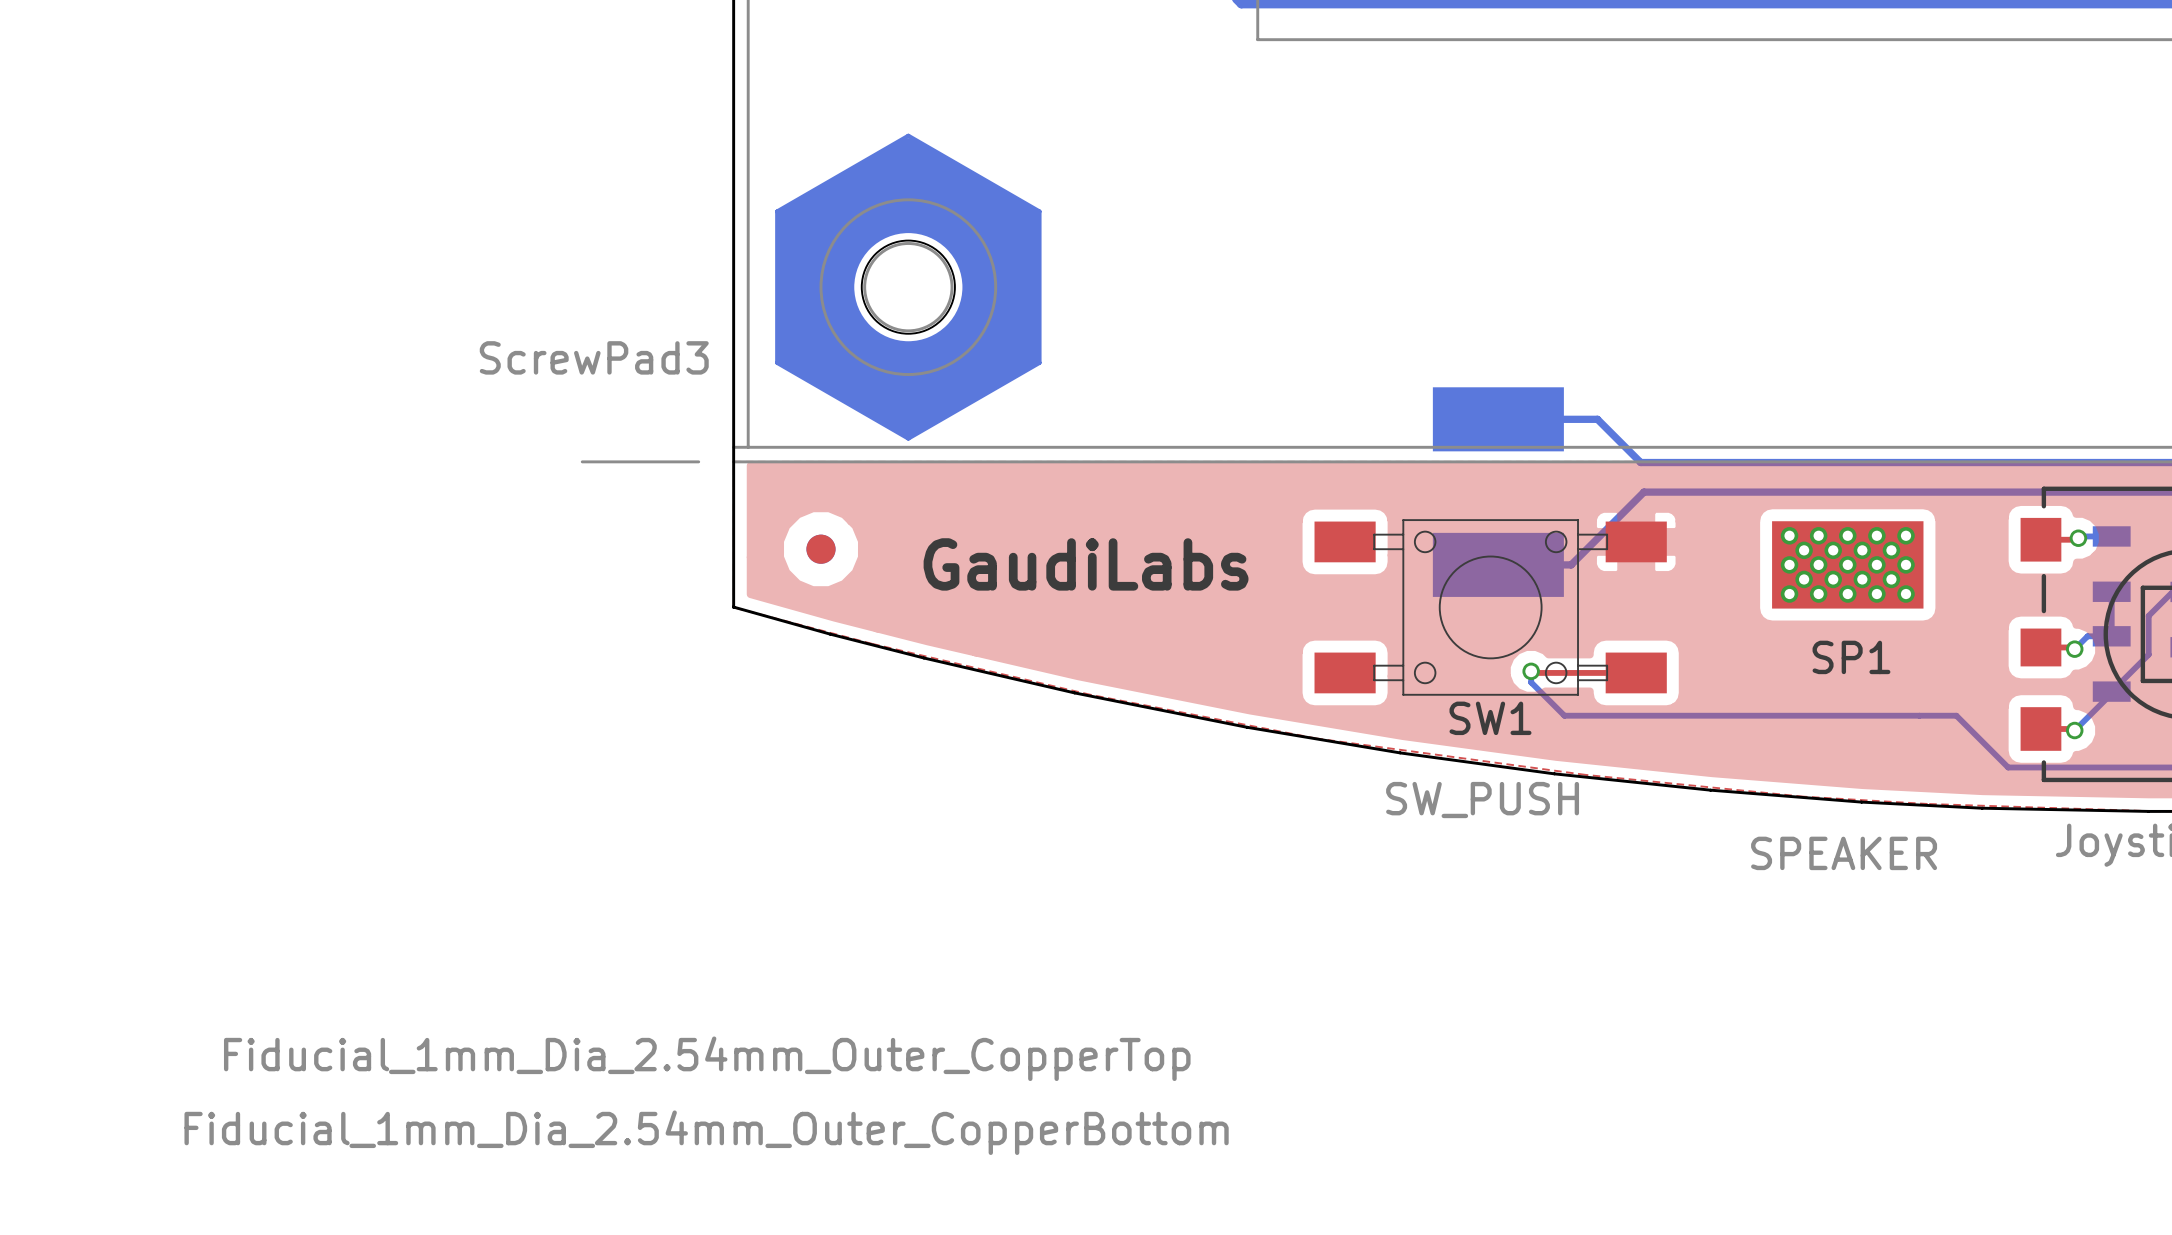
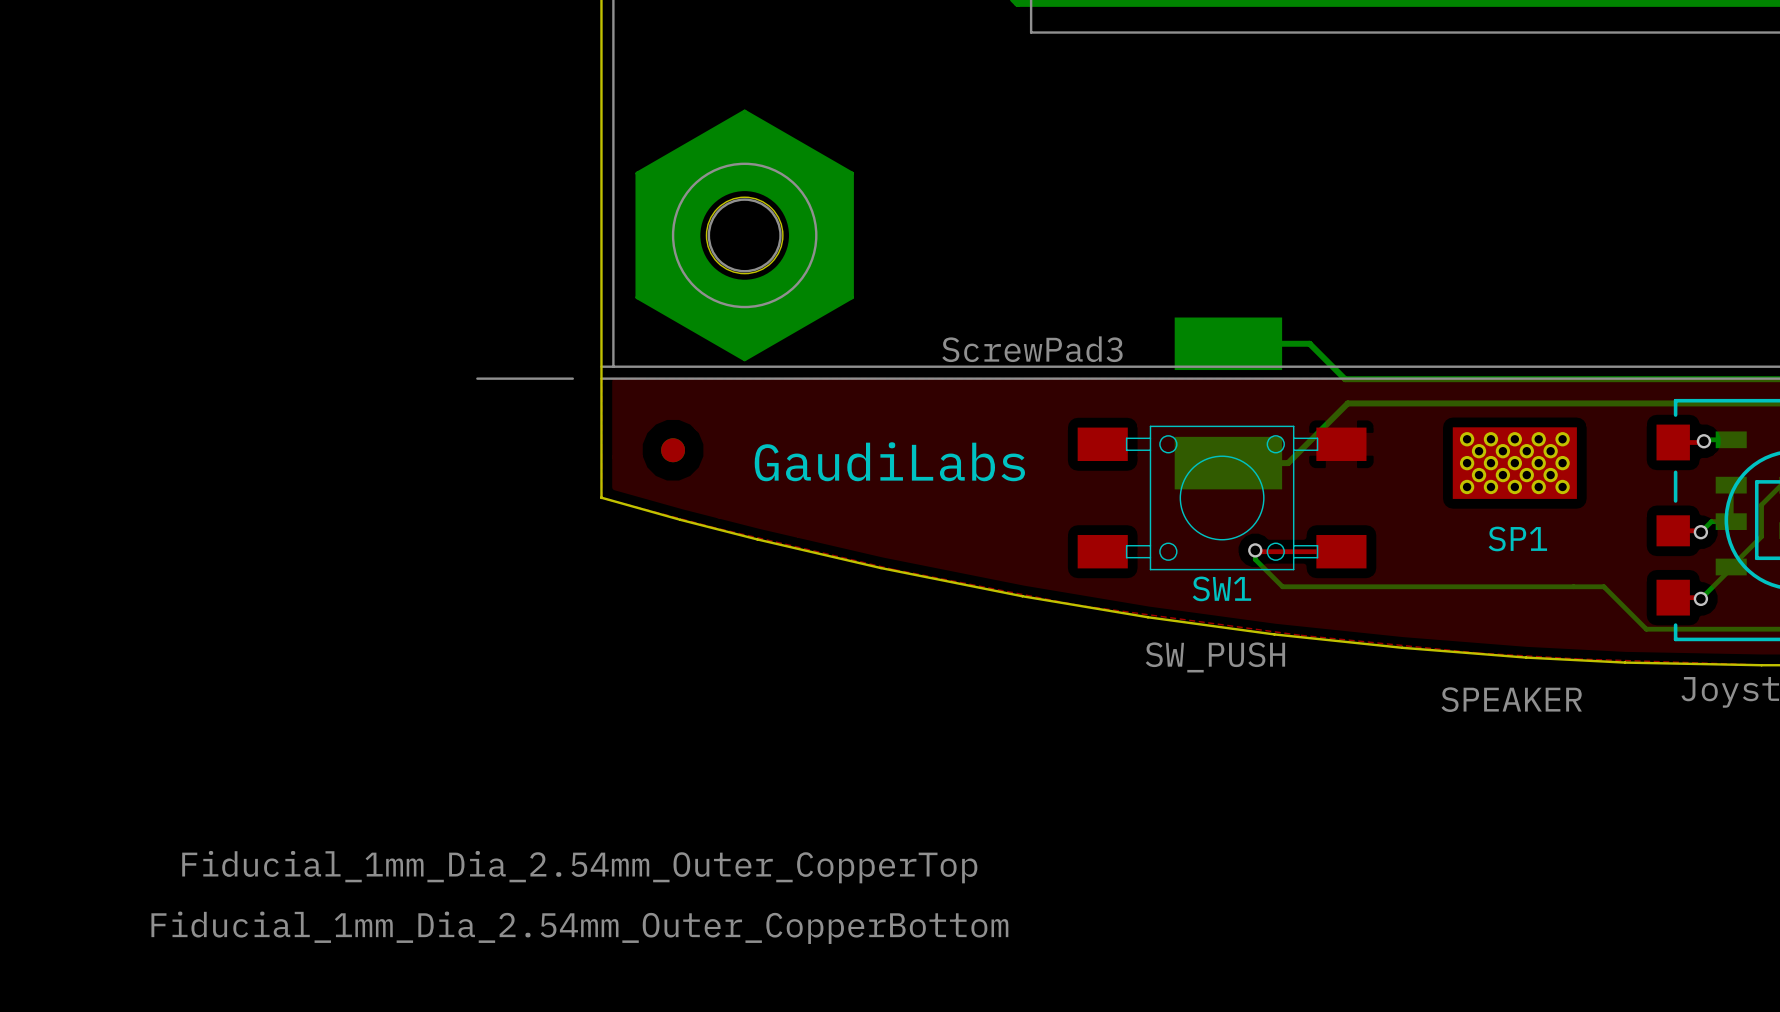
part footprint: [775, 133, 1042, 441] -> [635, 109, 854, 362]
part value position: ScrewPad3 (594, 357) -> ScrewPad3 (1032, 349)

